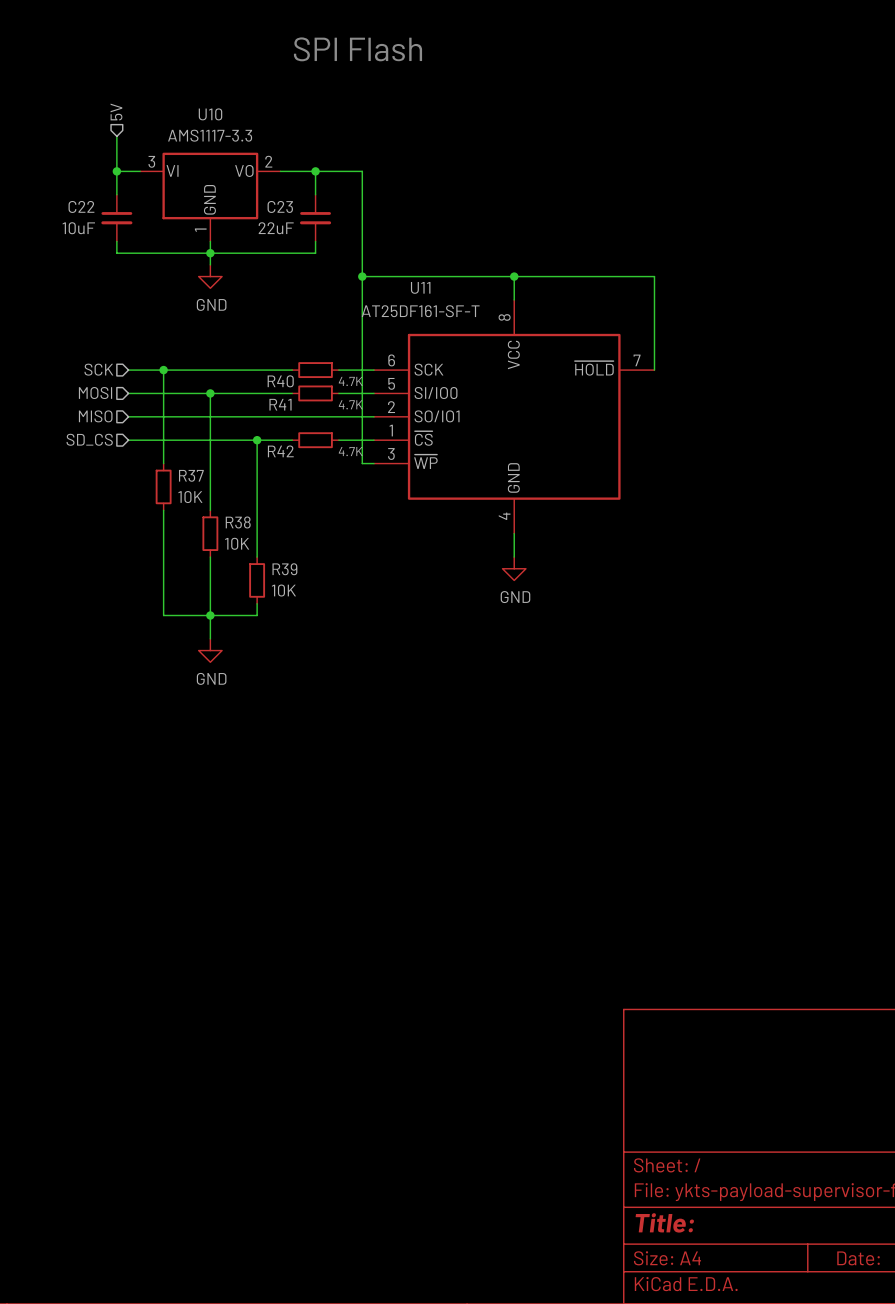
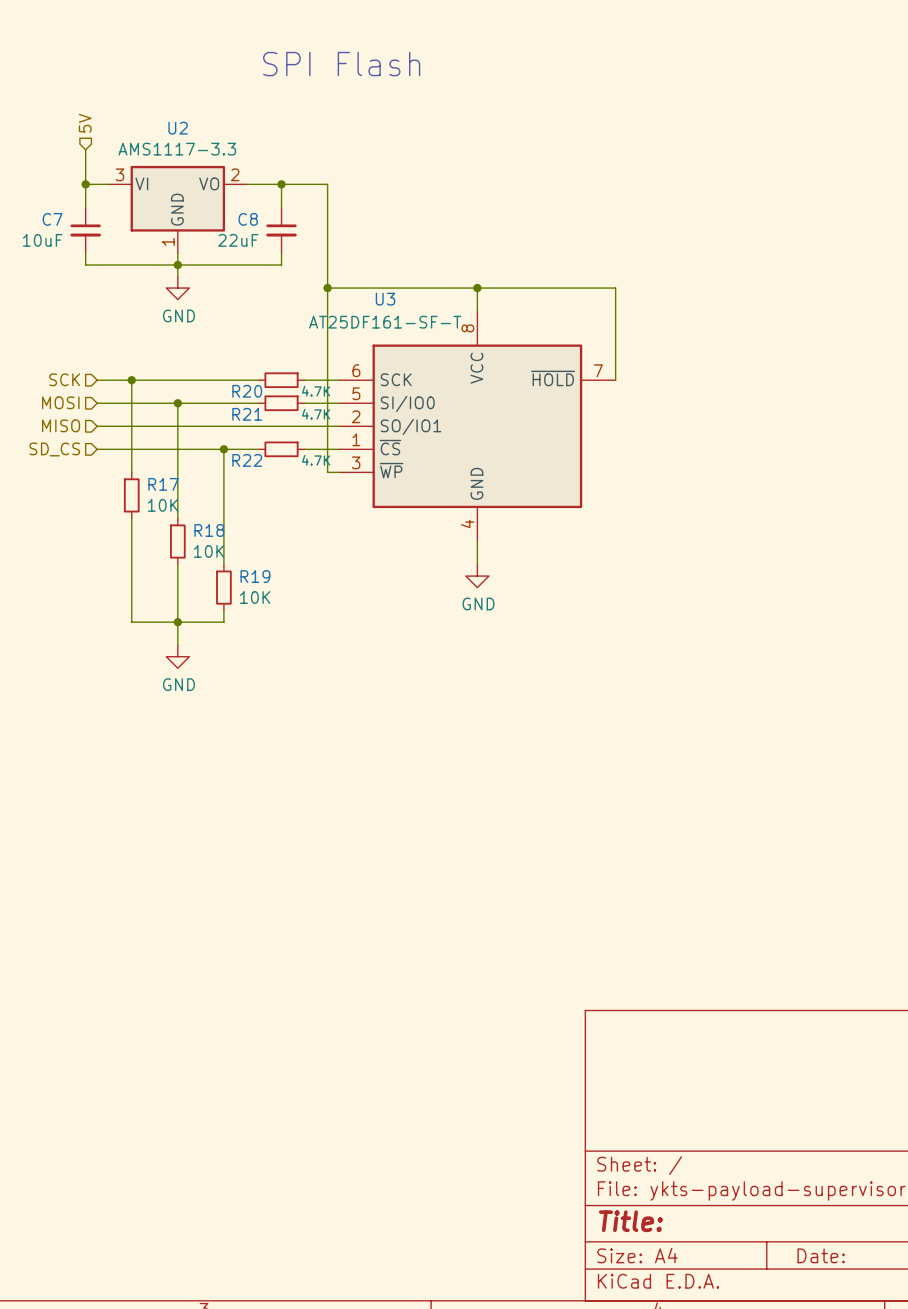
U10 name: U10 (210, 114) -> U2 (178, 128)
C22 name: C22 (81, 206) -> C7 (52, 219)
C23 name: C23 (280, 206) -> C8 (248, 219)
U11 name: U11 (420, 287) -> U3 (385, 299)
R40 name: R40 (280, 381) -> R20 (247, 391)
R41 name: R41 (280, 404) -> R21 (247, 414)
R42 name: R42 (280, 451) -> R22 (247, 460)
R37 name: R37 (191, 475) -> R17 (163, 484)
R38 name: R38 (238, 522) -> R18 (209, 530)
R39 name: R39 (284, 569) -> R19 (255, 576)

